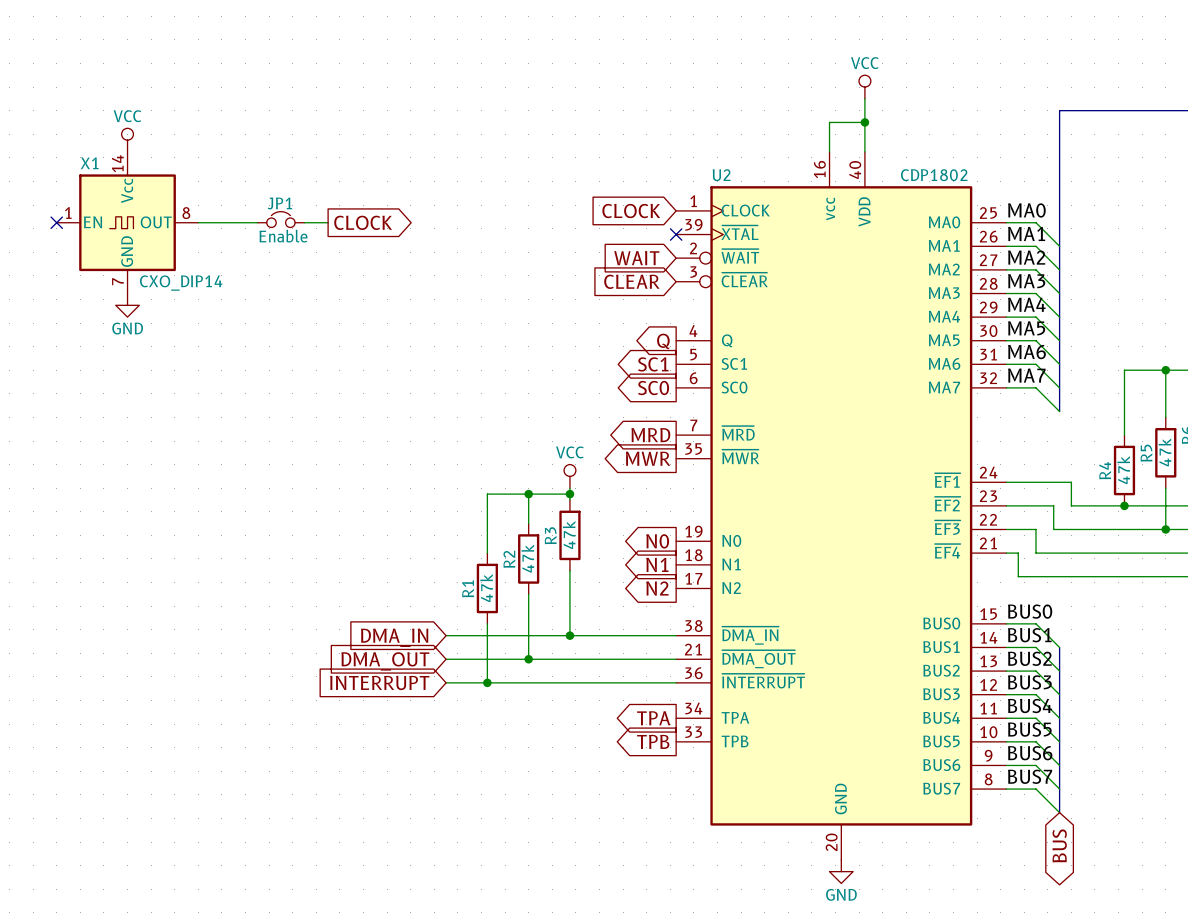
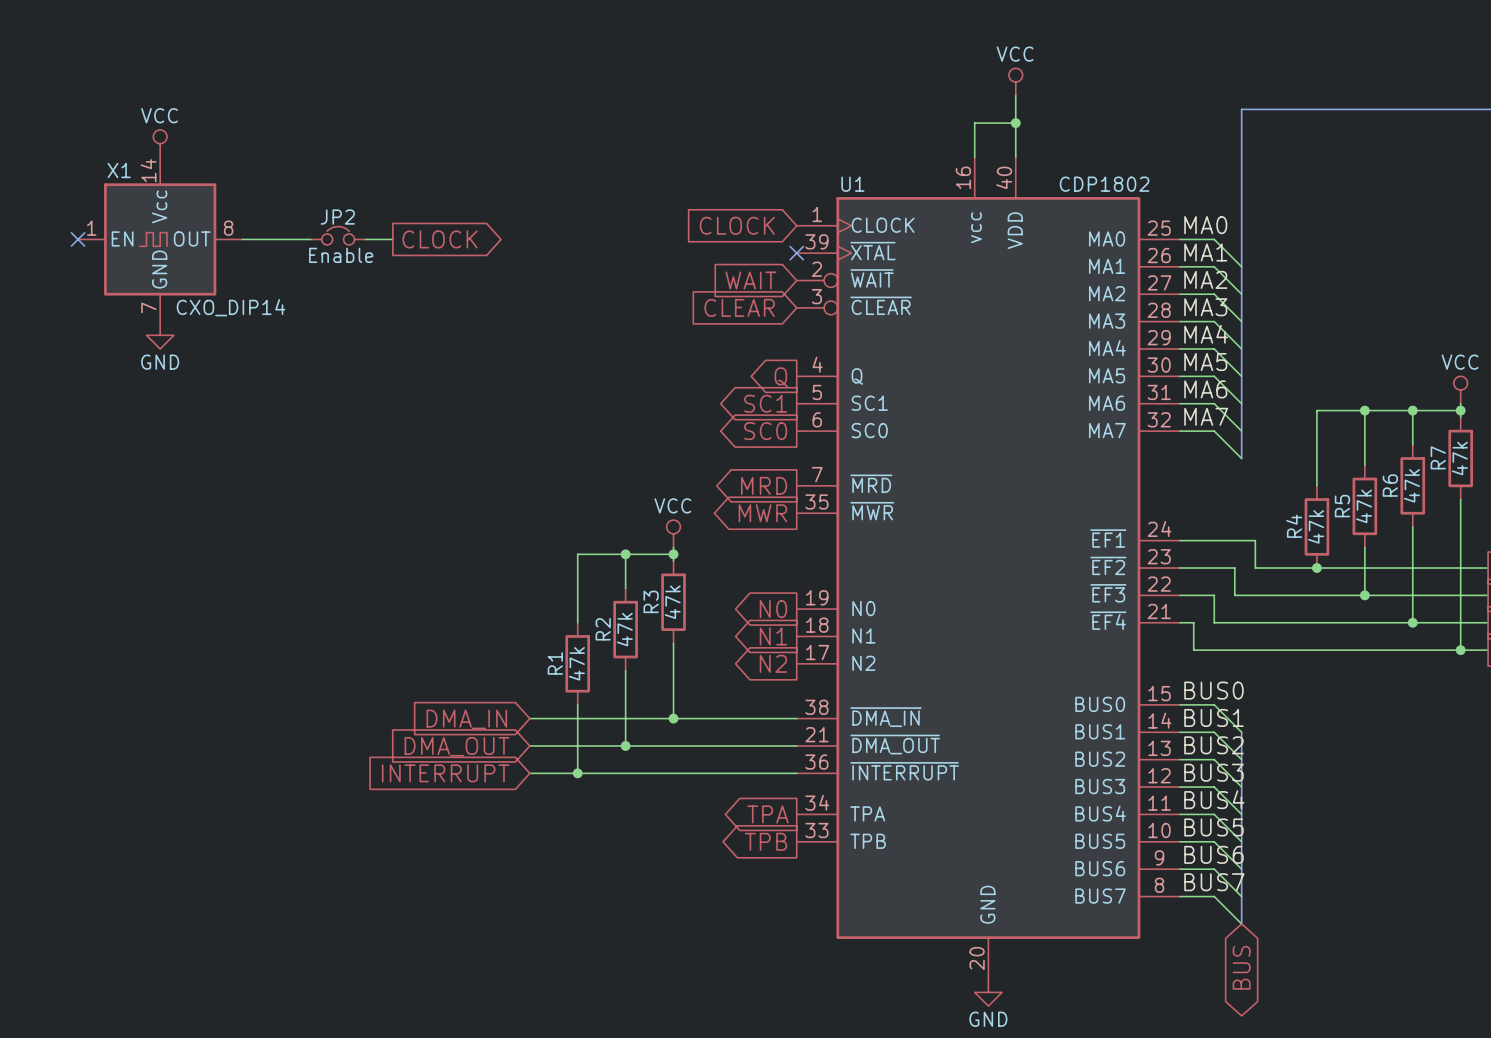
U2 name: U2 (721, 175) -> U1 (852, 184)
JP1 name: JP1 (279, 203) -> JP2 (337, 217)

